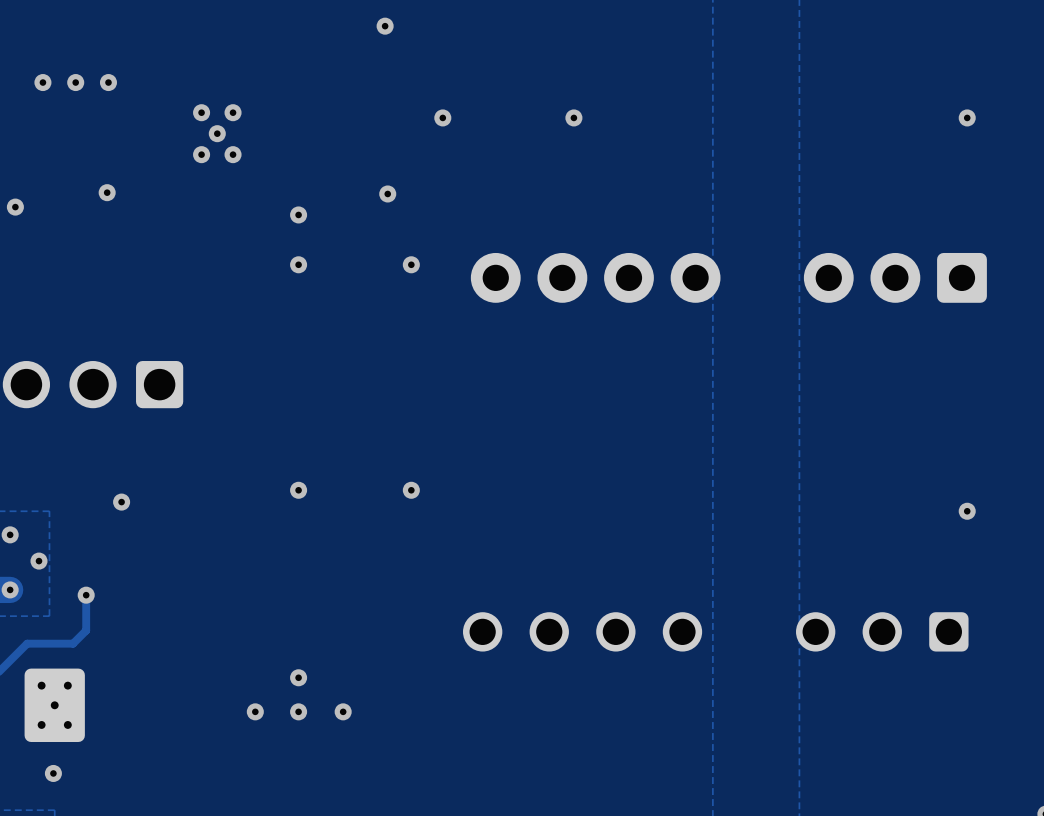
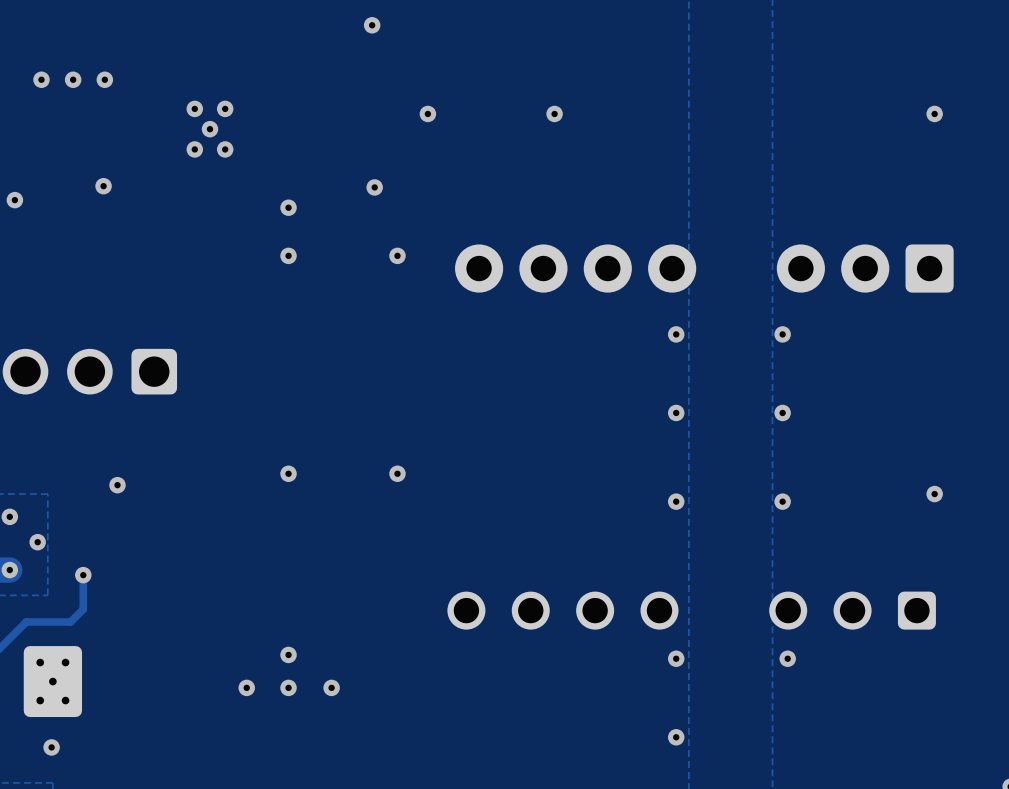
via: none -> (676, 334)
via: none -> (782, 334)
via: none -> (676, 412)
via: none -> (782, 412)
via: none -> (676, 501)
via: none -> (782, 501)
via: none -> (676, 658)
via: none -> (787, 658)
via: none -> (676, 737)

